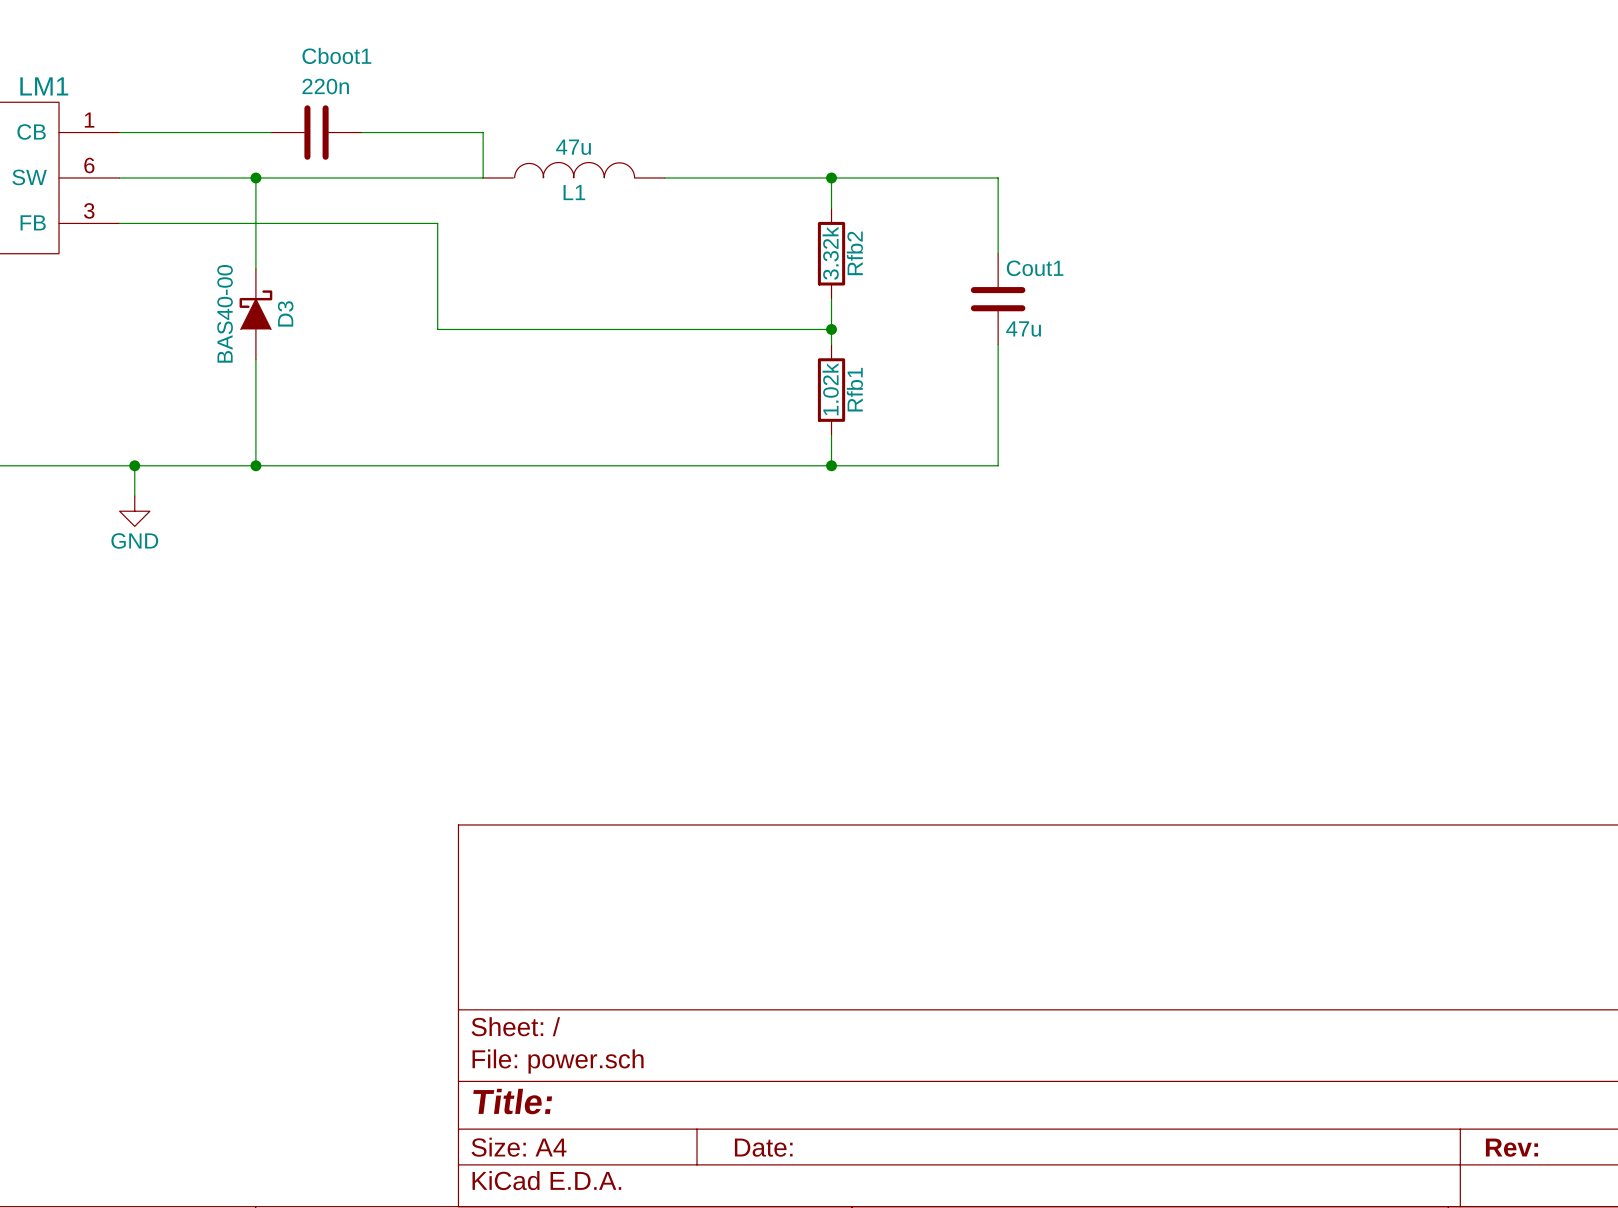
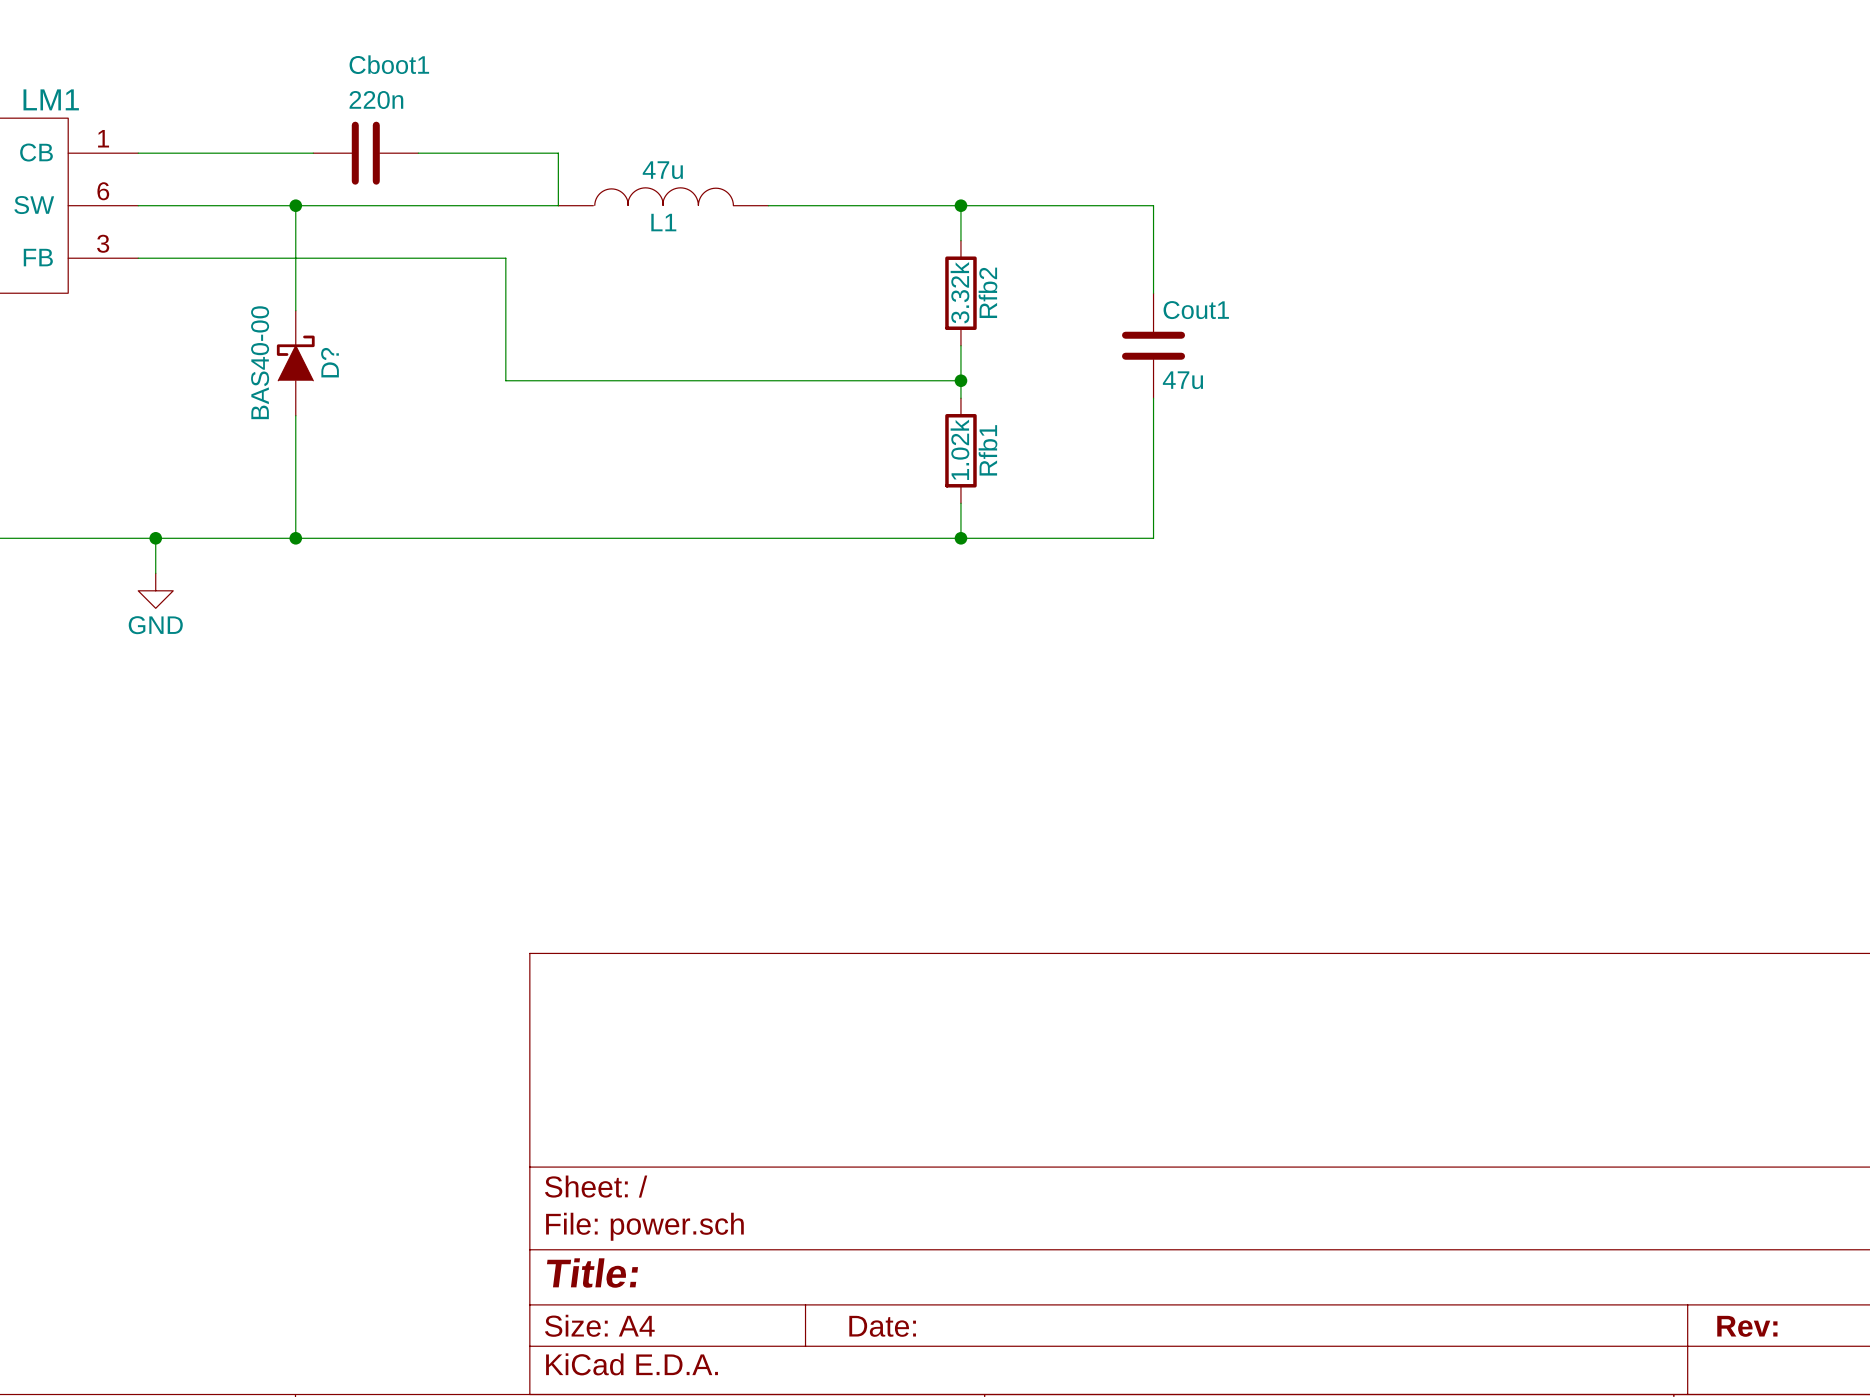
D3 name: D3 (285, 313) -> D? (329, 362)

